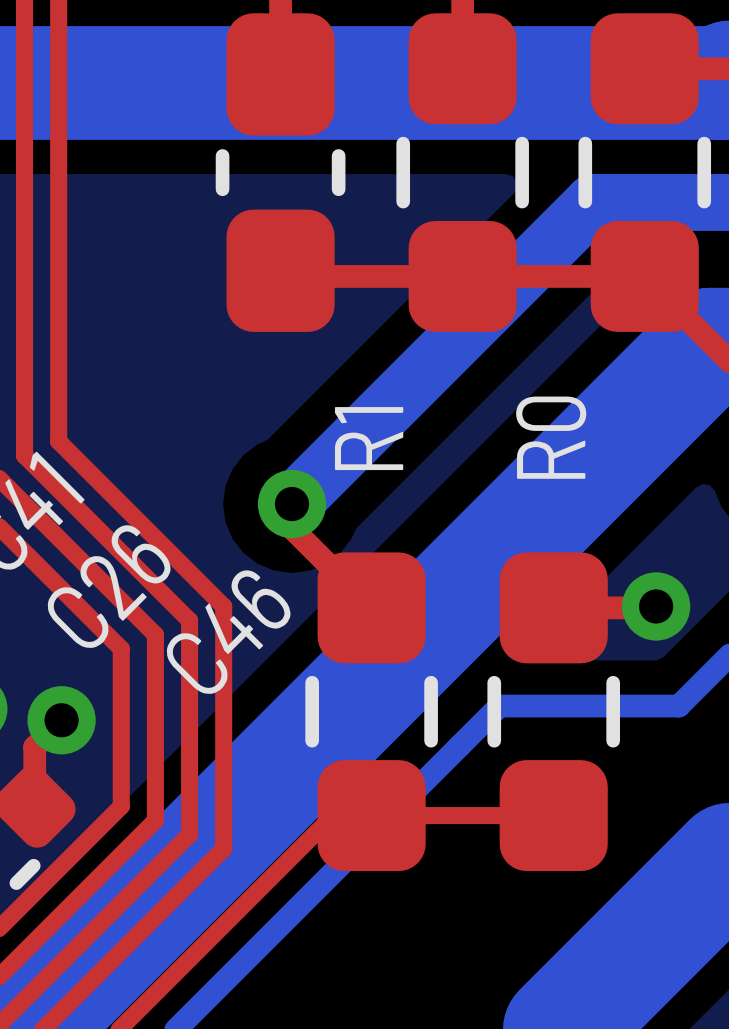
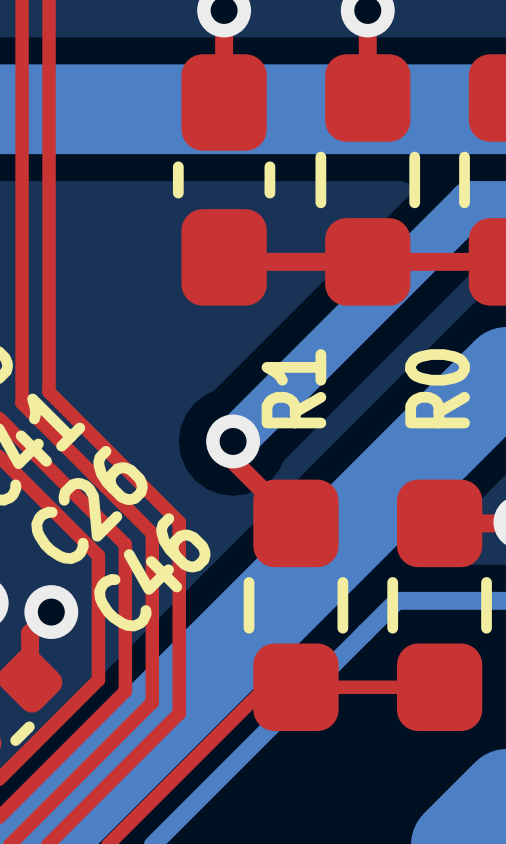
C46 name position: C46 (228, 632) -> C46 (152, 572)

